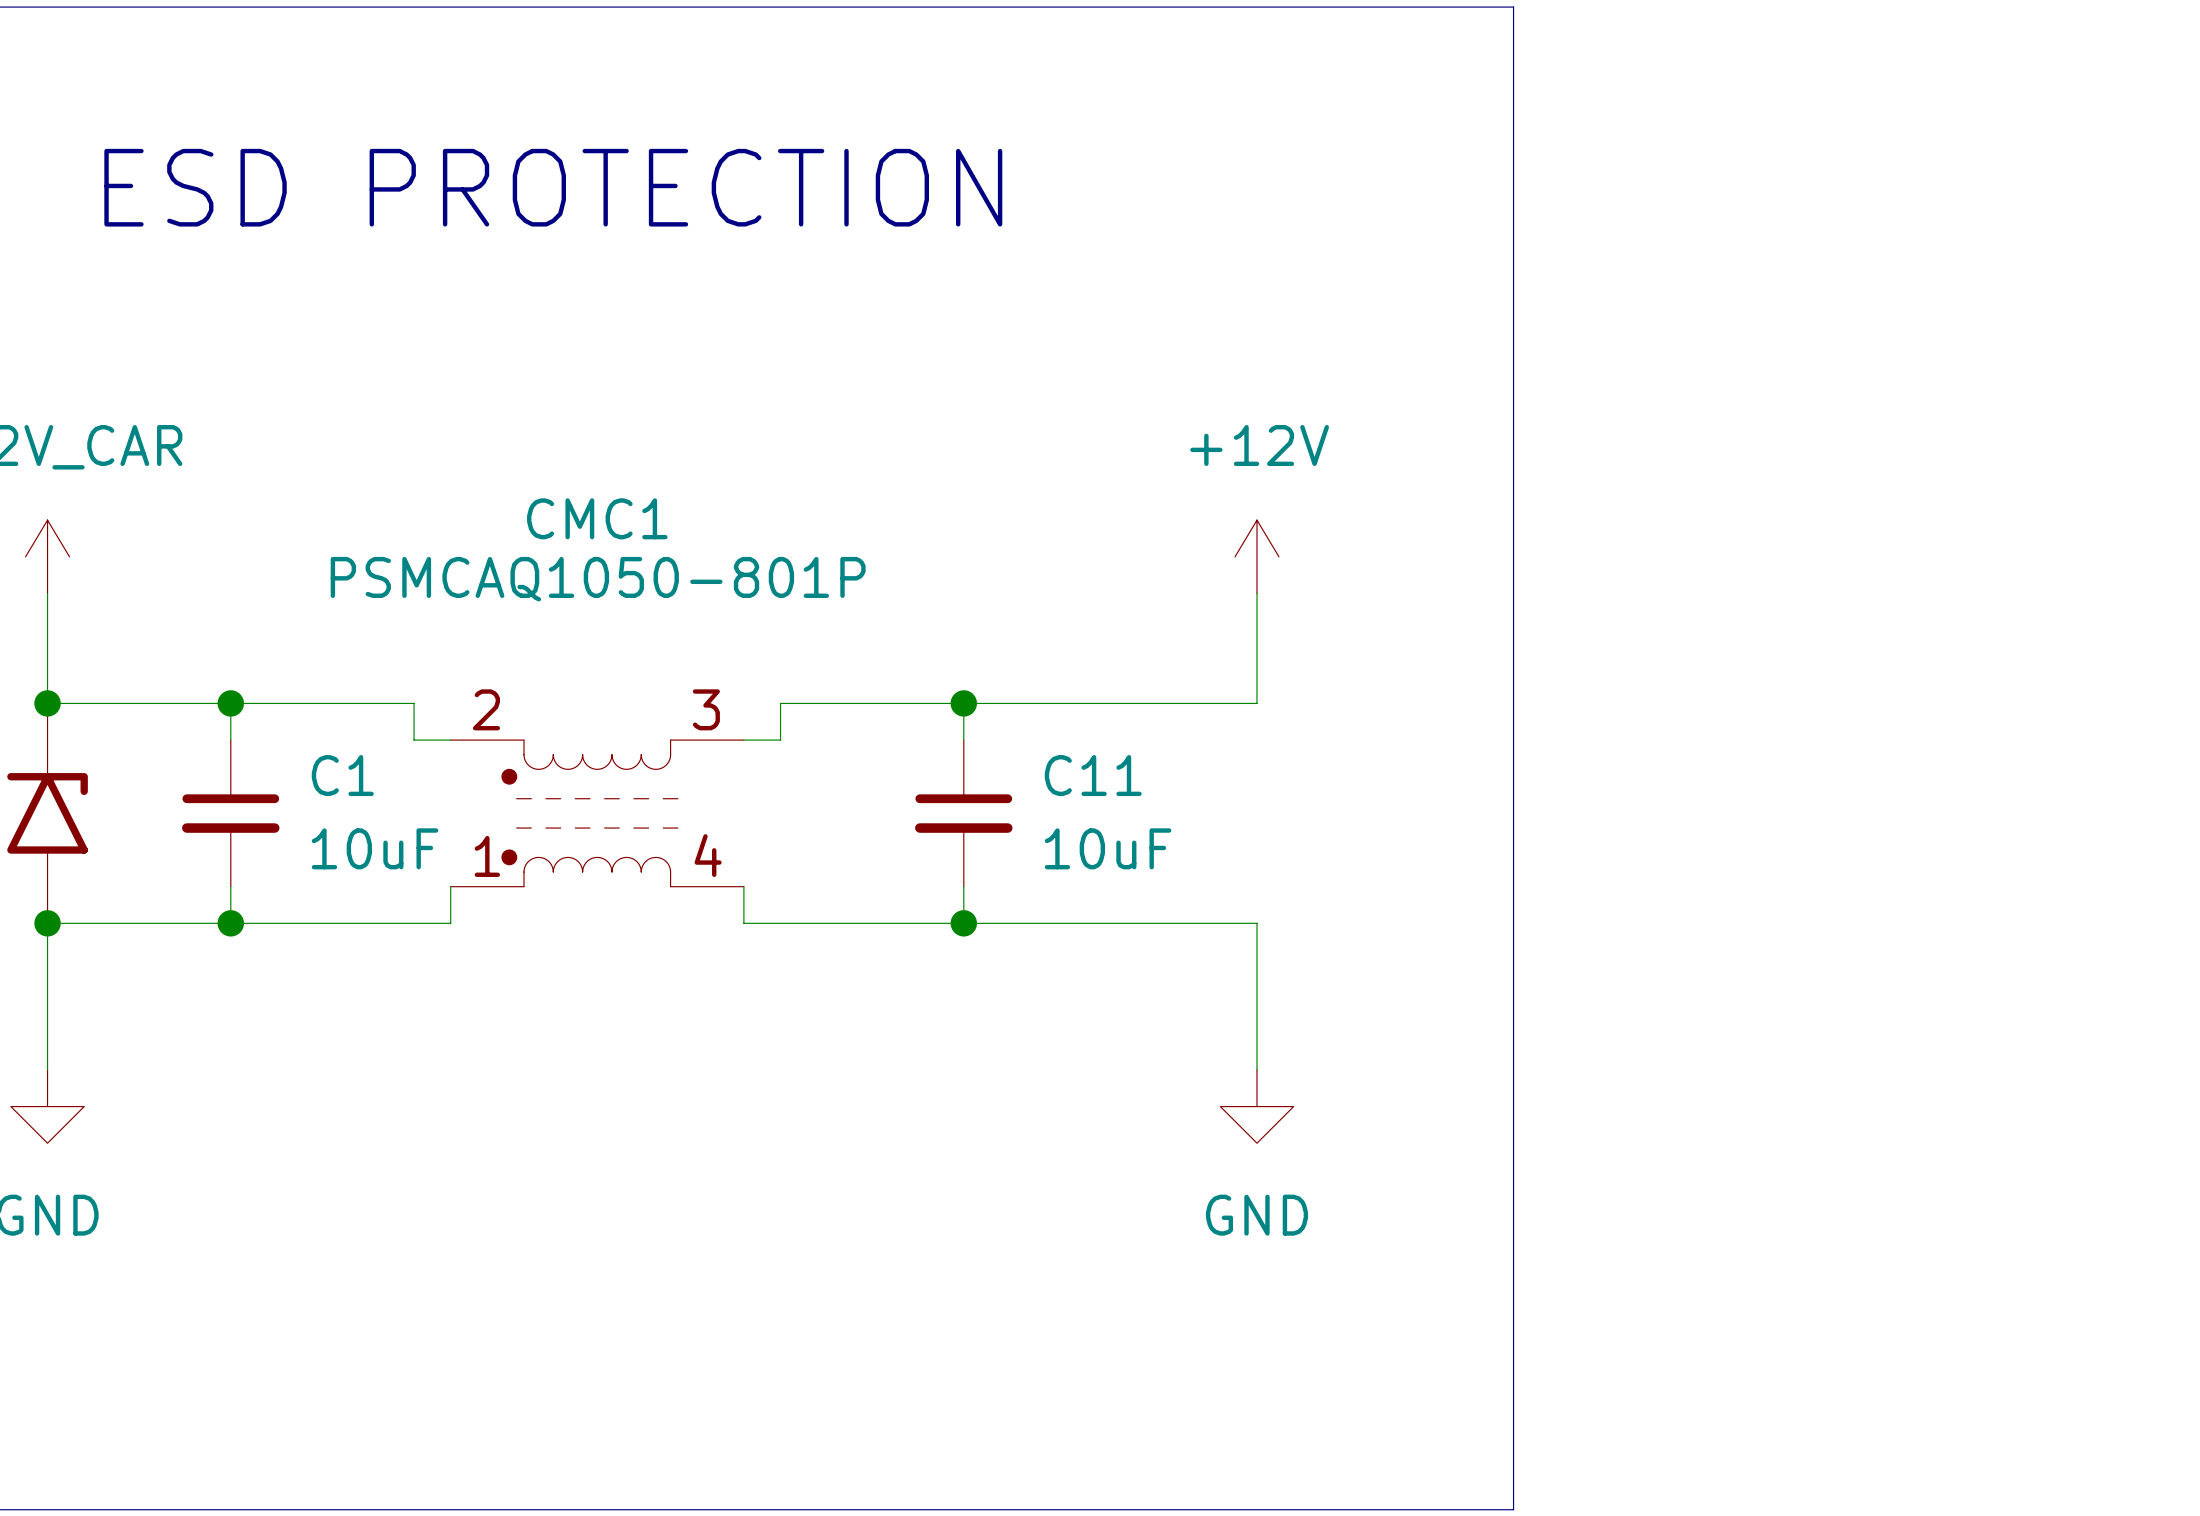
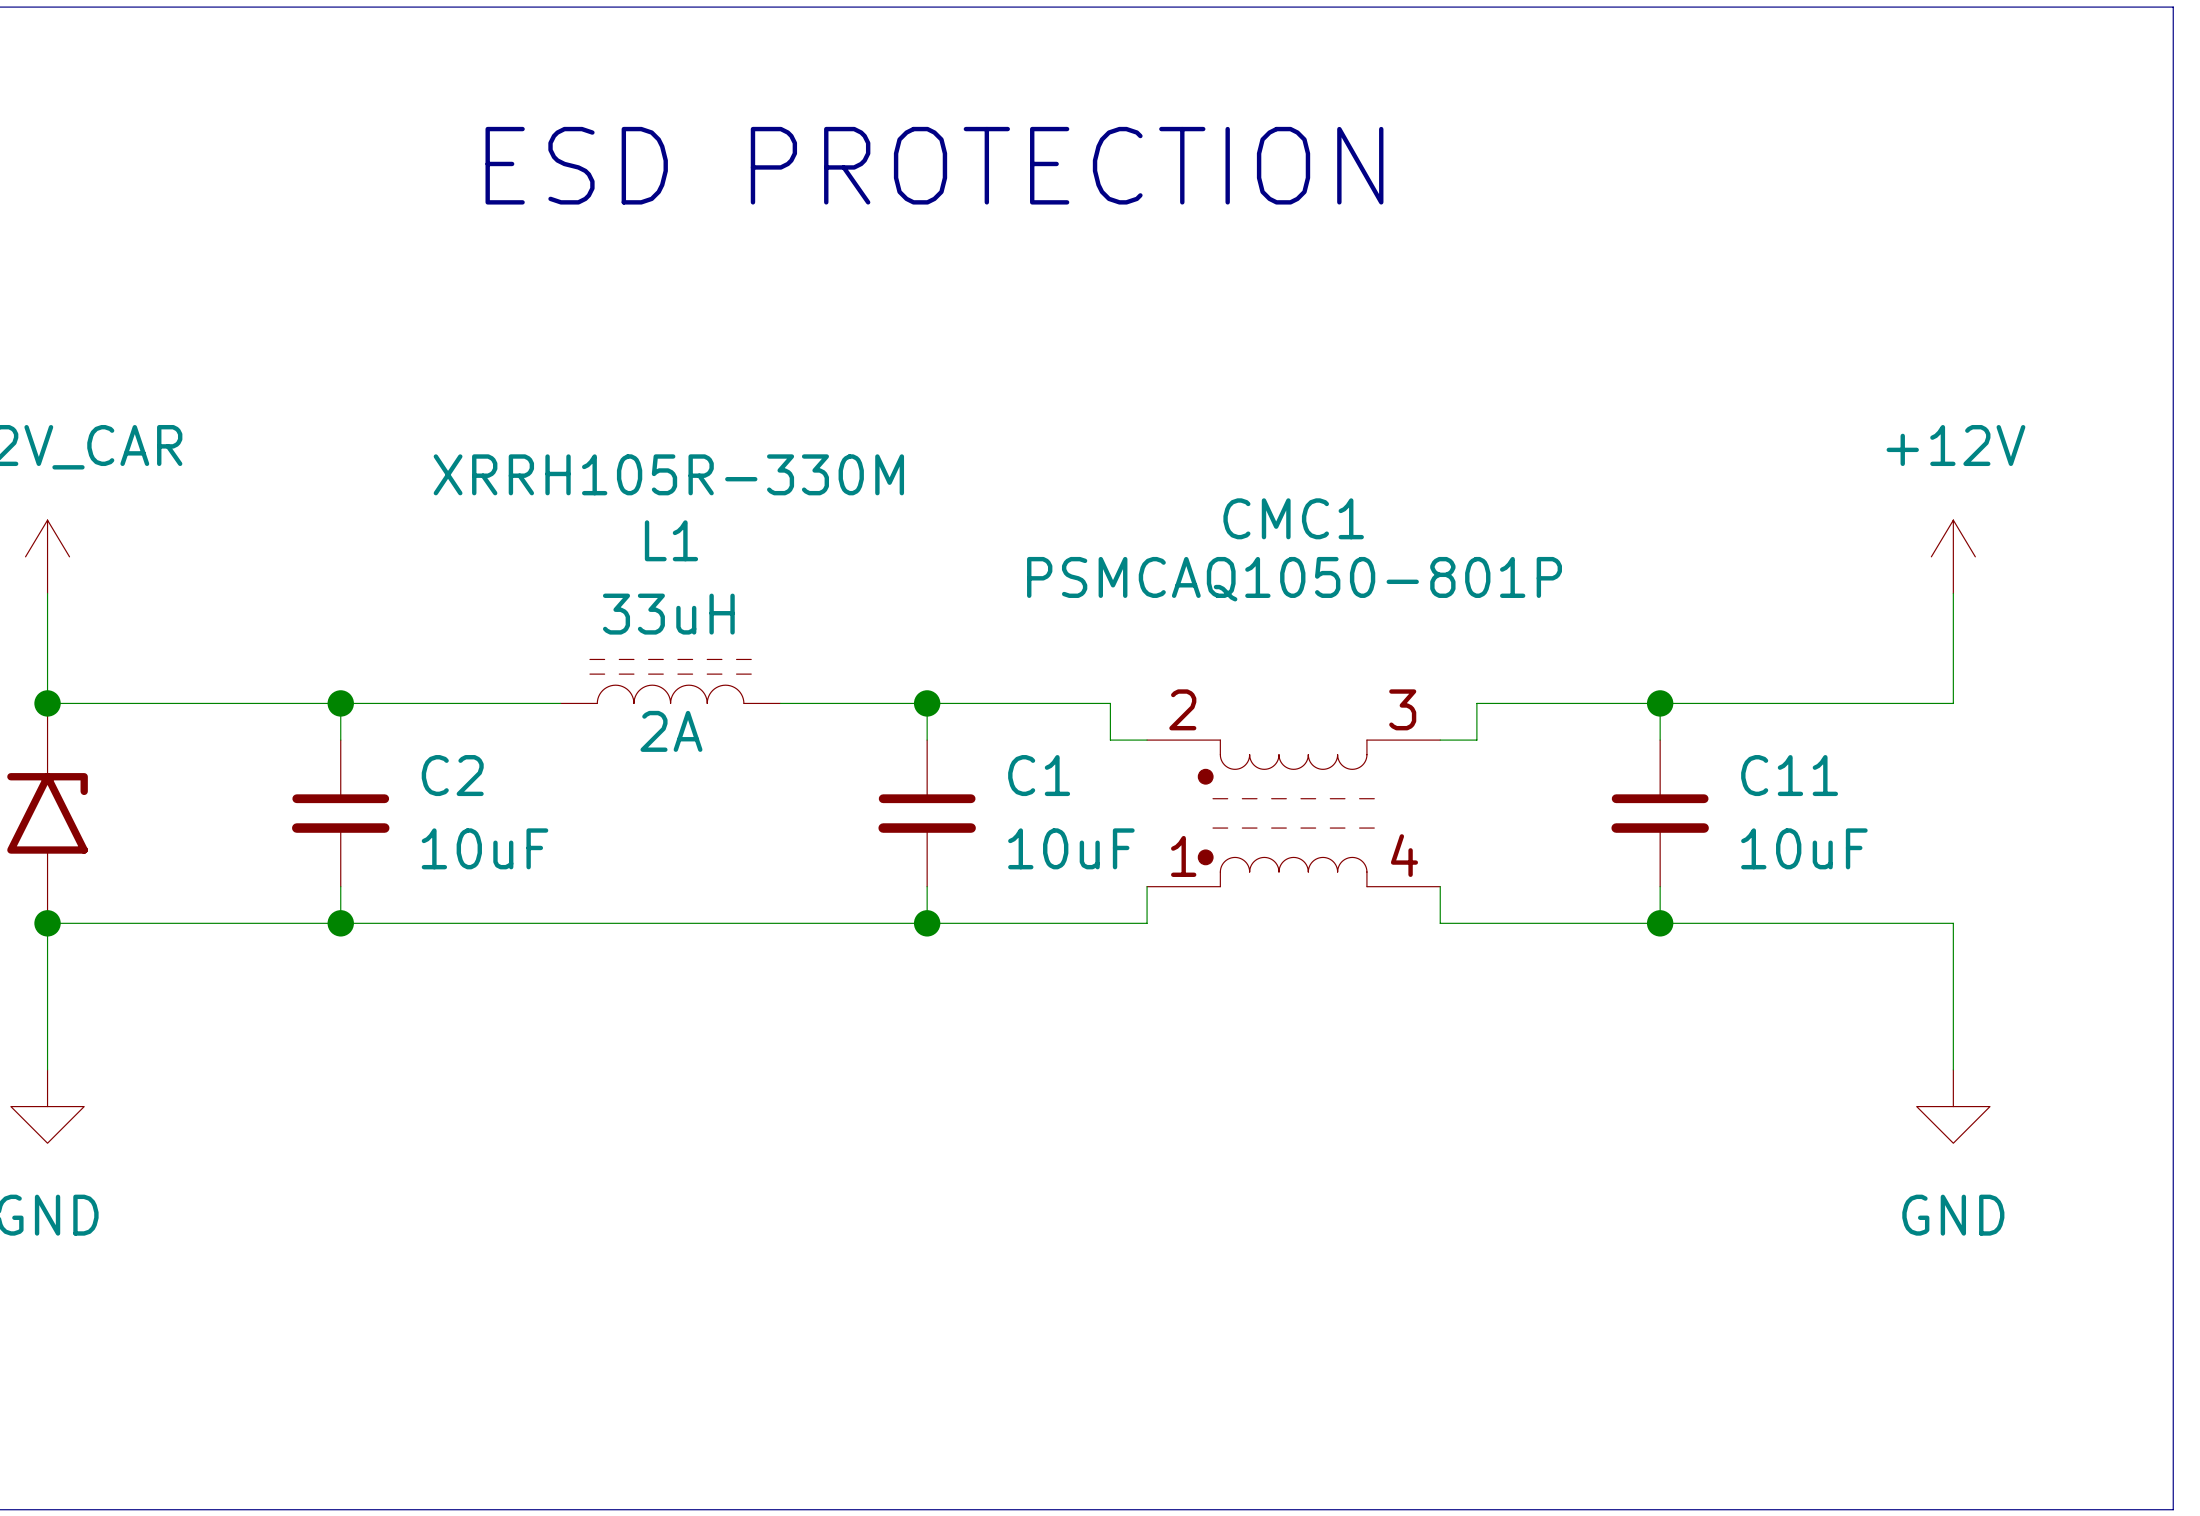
line: (1513, 7) (1513, 1509) -> (1513, 7) (2173, 7) (2173, 1509) (1513, 1509)
text position: ESD PROTECTION (553, 187) -> ESD PROTECTION (934, 165)
power symbol position: +12V (1257, 556) -> +12V (1953, 556)
wire: (1257, 593) (1257, 703) (1110, 703) -> (1147, 740) (1110, 740) (1110, 703)
wire: none -> (1953, 593) (1953, 703) (1476, 703) (1476, 740) (1440, 740)
L1: none -> 33uH (670, 681)
wire: (230, 703) (230, 740) -> (927, 703) (927, 740)
junction position: (230, 703) -> (340, 703)
wire: none -> (340, 703) (340, 740)
wire: (414, 703) (414, 740) (450, 740) -> (414, 703) (560, 703)
wire: (780, 703) (780, 740) (743, 740) -> none
wire: (963, 703) (963, 740) -> (1660, 703) (1660, 740)
junction position: (963, 703) -> (927, 703)
junction: none -> (1660, 703)
C1 position: (230, 813) -> (927, 813)
C2: none -> 10uF (340, 813)
CMC1 position: (597, 813) -> (1293, 813)
C11 position: (963, 813) -> (1660, 813)
wire: (230, 886) (230, 923) -> (927, 886) (927, 923)
wire: (450, 886) (450, 923) -> (743, 923) (450, 923)
wire: (743, 886) (743, 923) -> (340, 886) (340, 923)
wire: (963, 886) (963, 923) -> (1660, 886) (1660, 923)
wire: none -> (1440, 886) (1440, 923) (1953, 923) (1953, 1069)
junction position: (230, 923) -> (340, 923)
junction position: (963, 923) -> (927, 923)
wire: (1147, 923) (1257, 923) (1257, 1069) -> (1147, 923) (1147, 886)
junction: none -> (1660, 923)
power symbol position: GND (1257, 1106) -> GND (1953, 1106)

